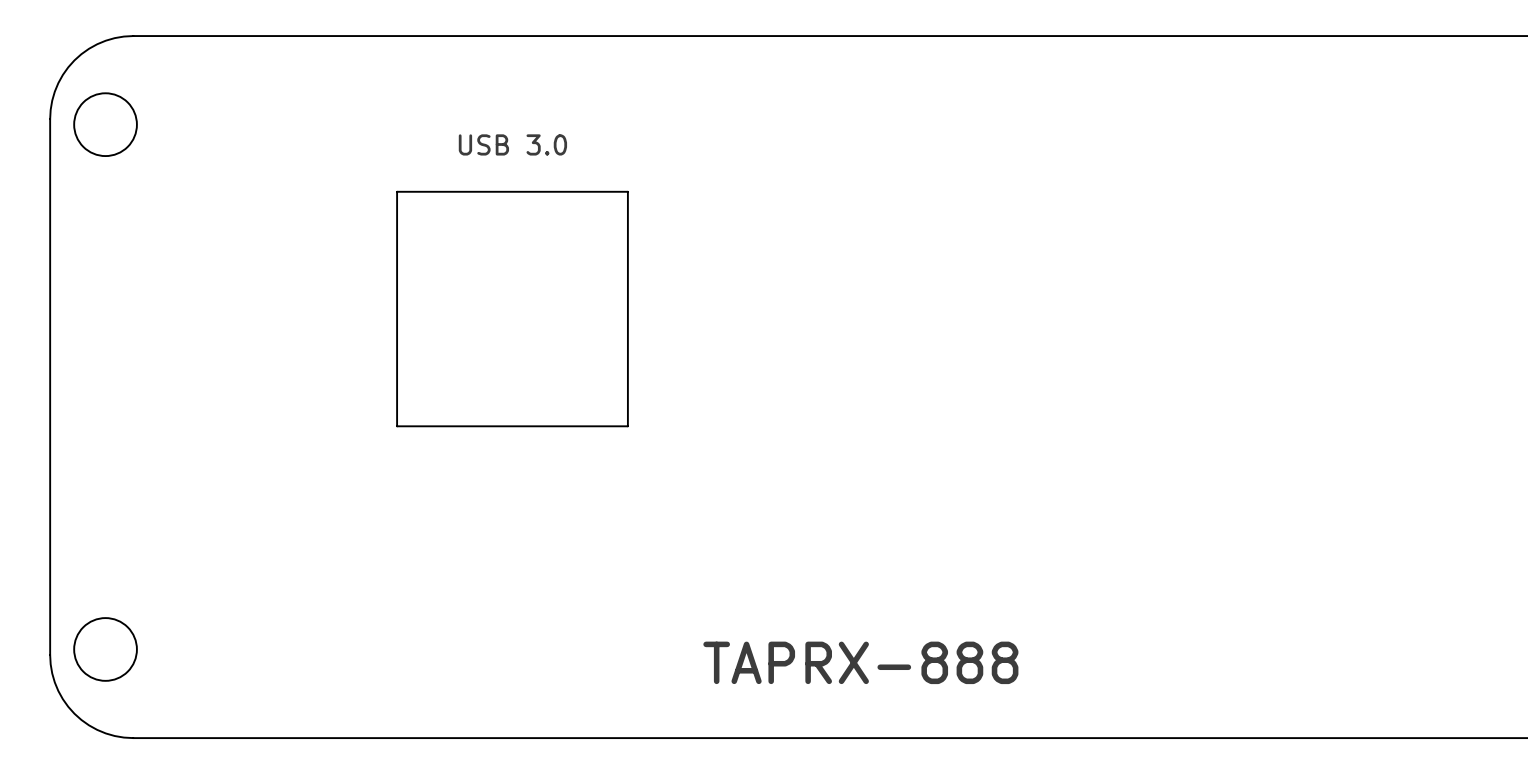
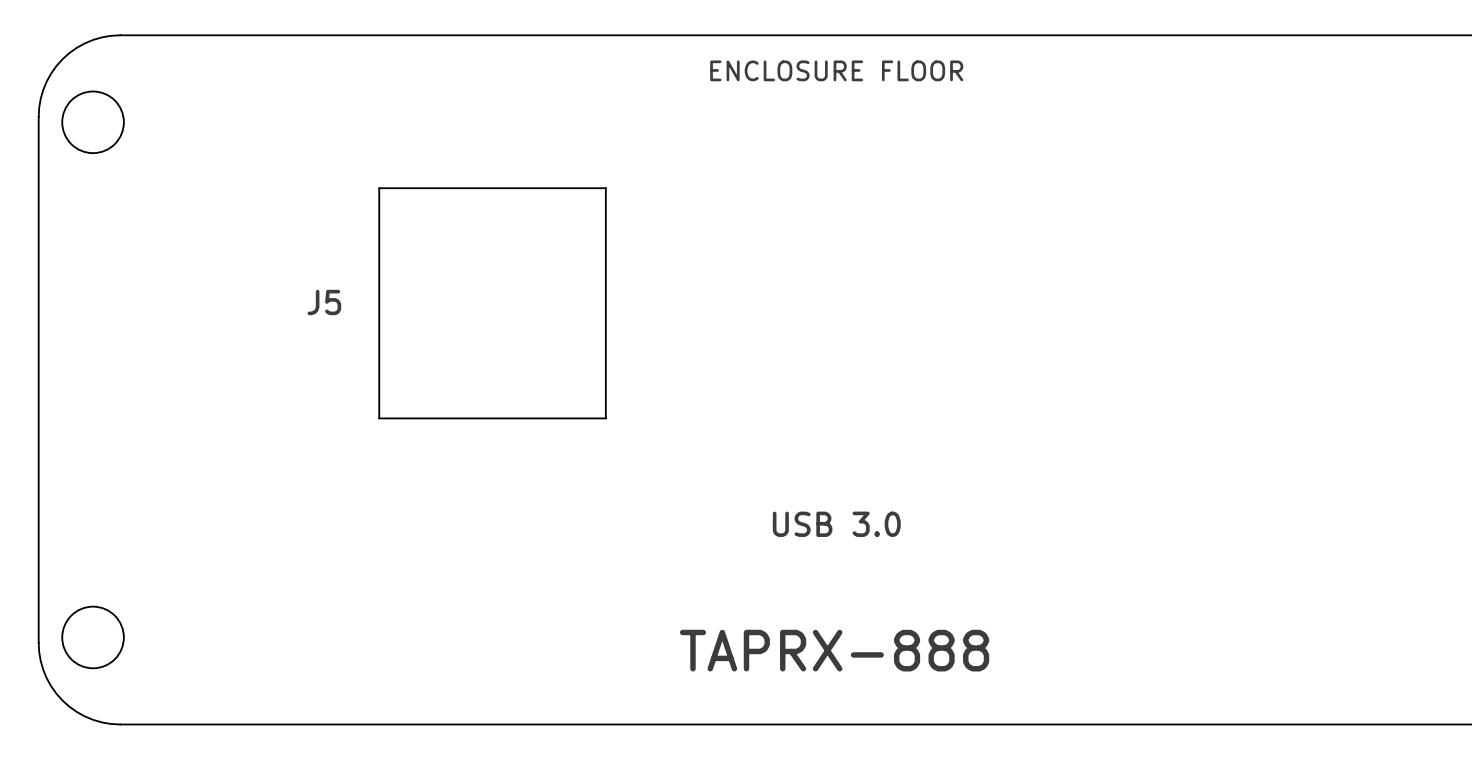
text: none -> ENCLOSURE FLOOR (836, 70)
text: USB 3.0 (512, 144) -> none
text: none -> J5 (324, 302)
text: none -> USB 3.0 (836, 524)

